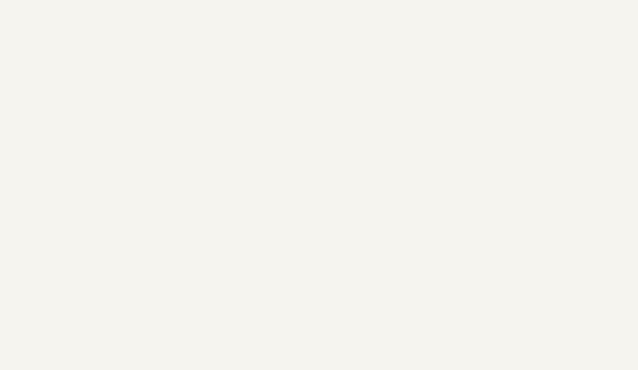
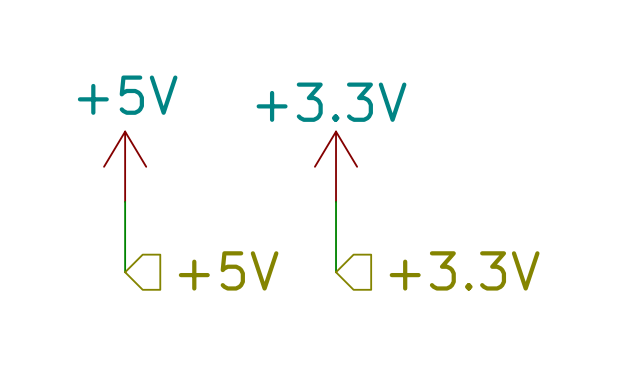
power symbol: none -> +5V (125, 166)
power symbol: none -> +3.3V (336, 166)
wire: none -> (125, 201) (125, 272)
wire: none -> (336, 201) (336, 272)
hierarchical label: none -> +3.3V (464, 270)
hierarchical label: none -> +5V (228, 270)

